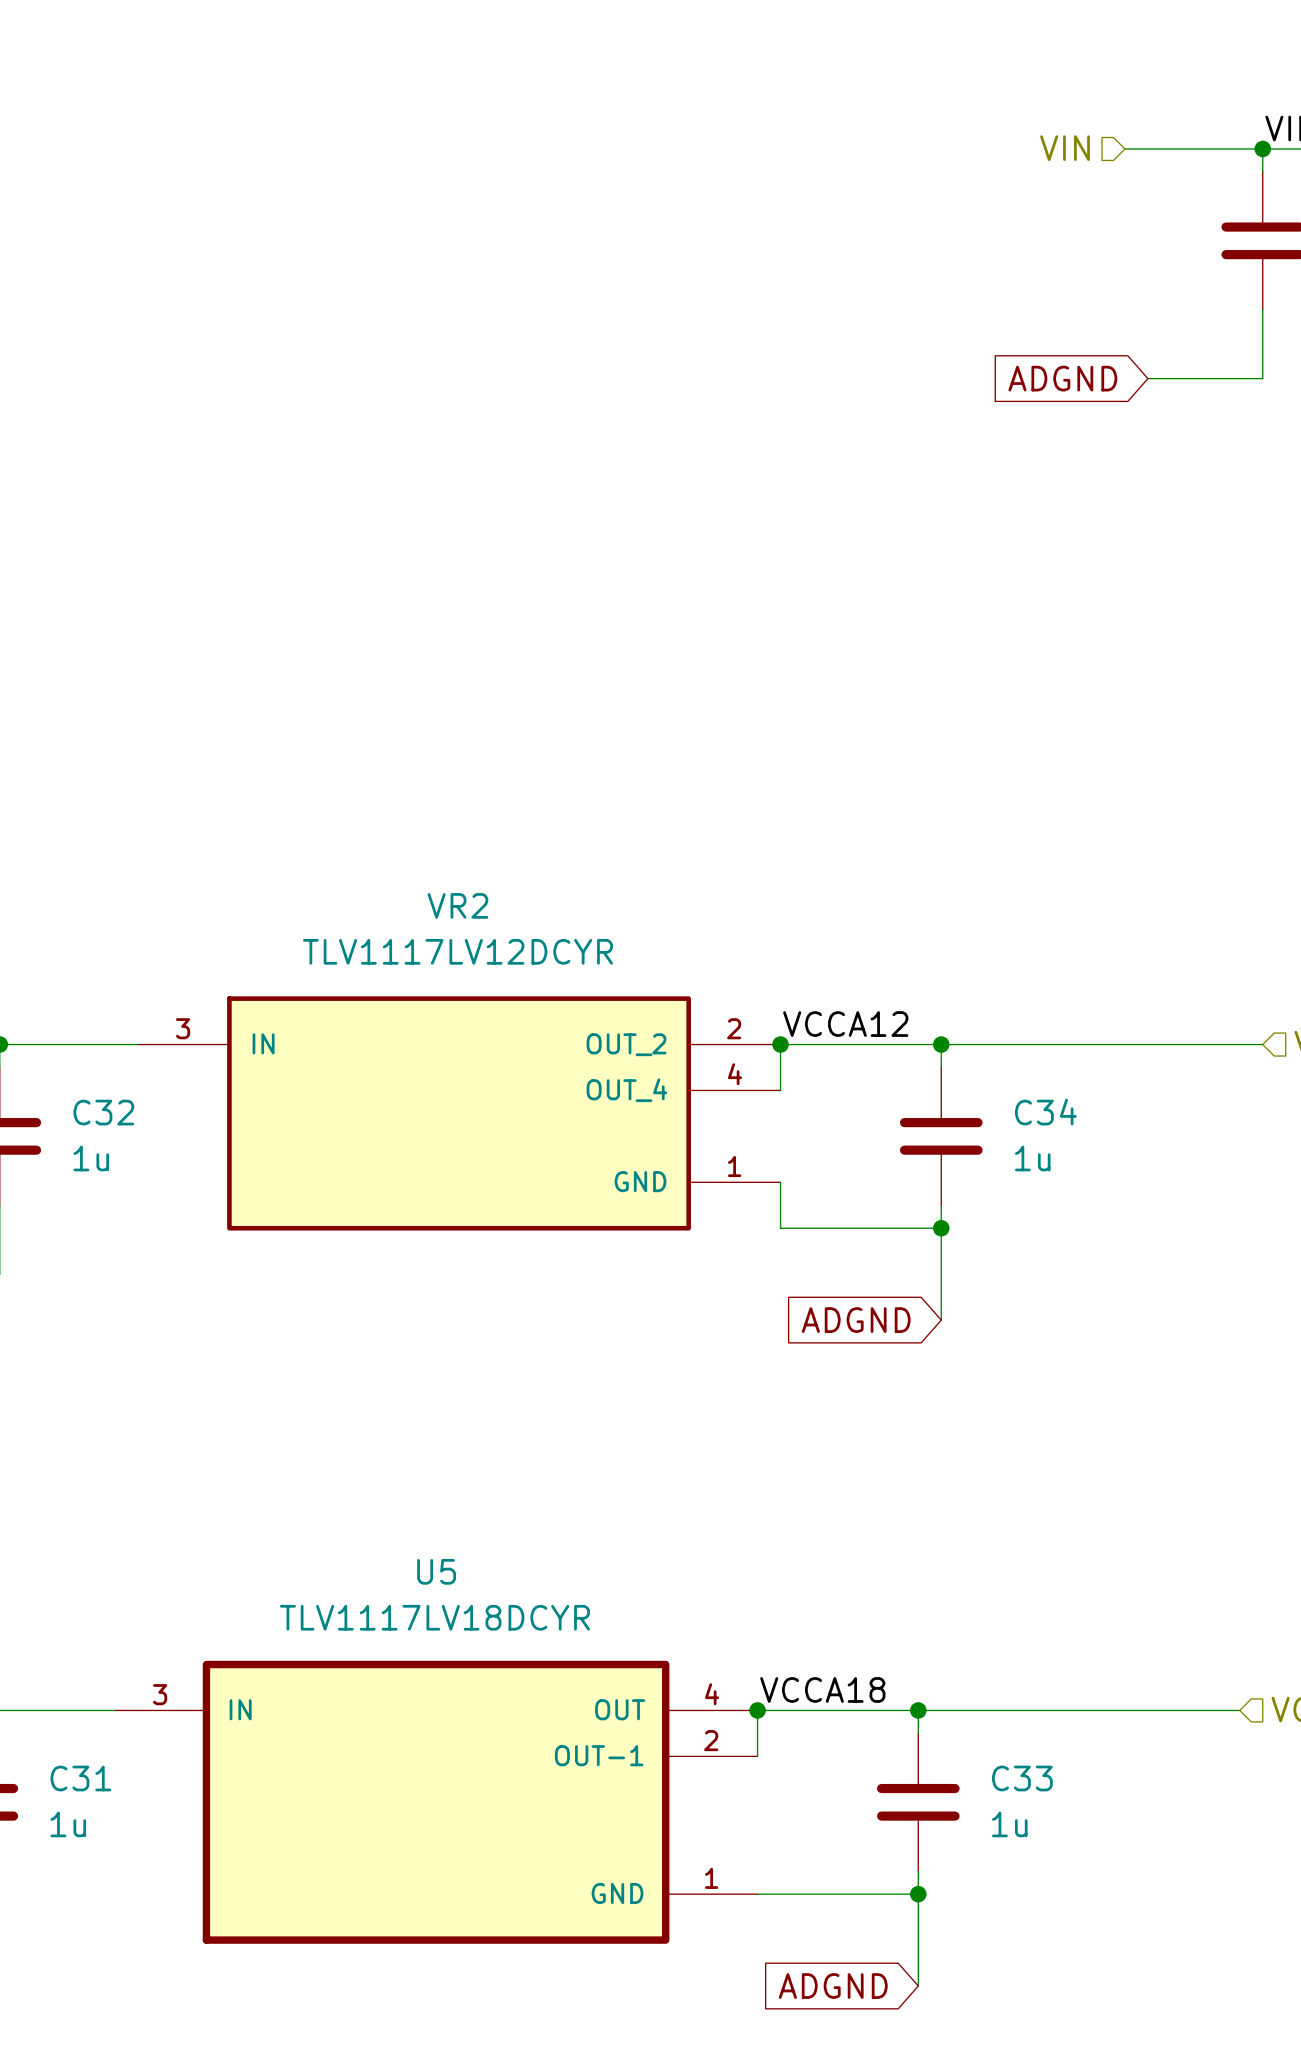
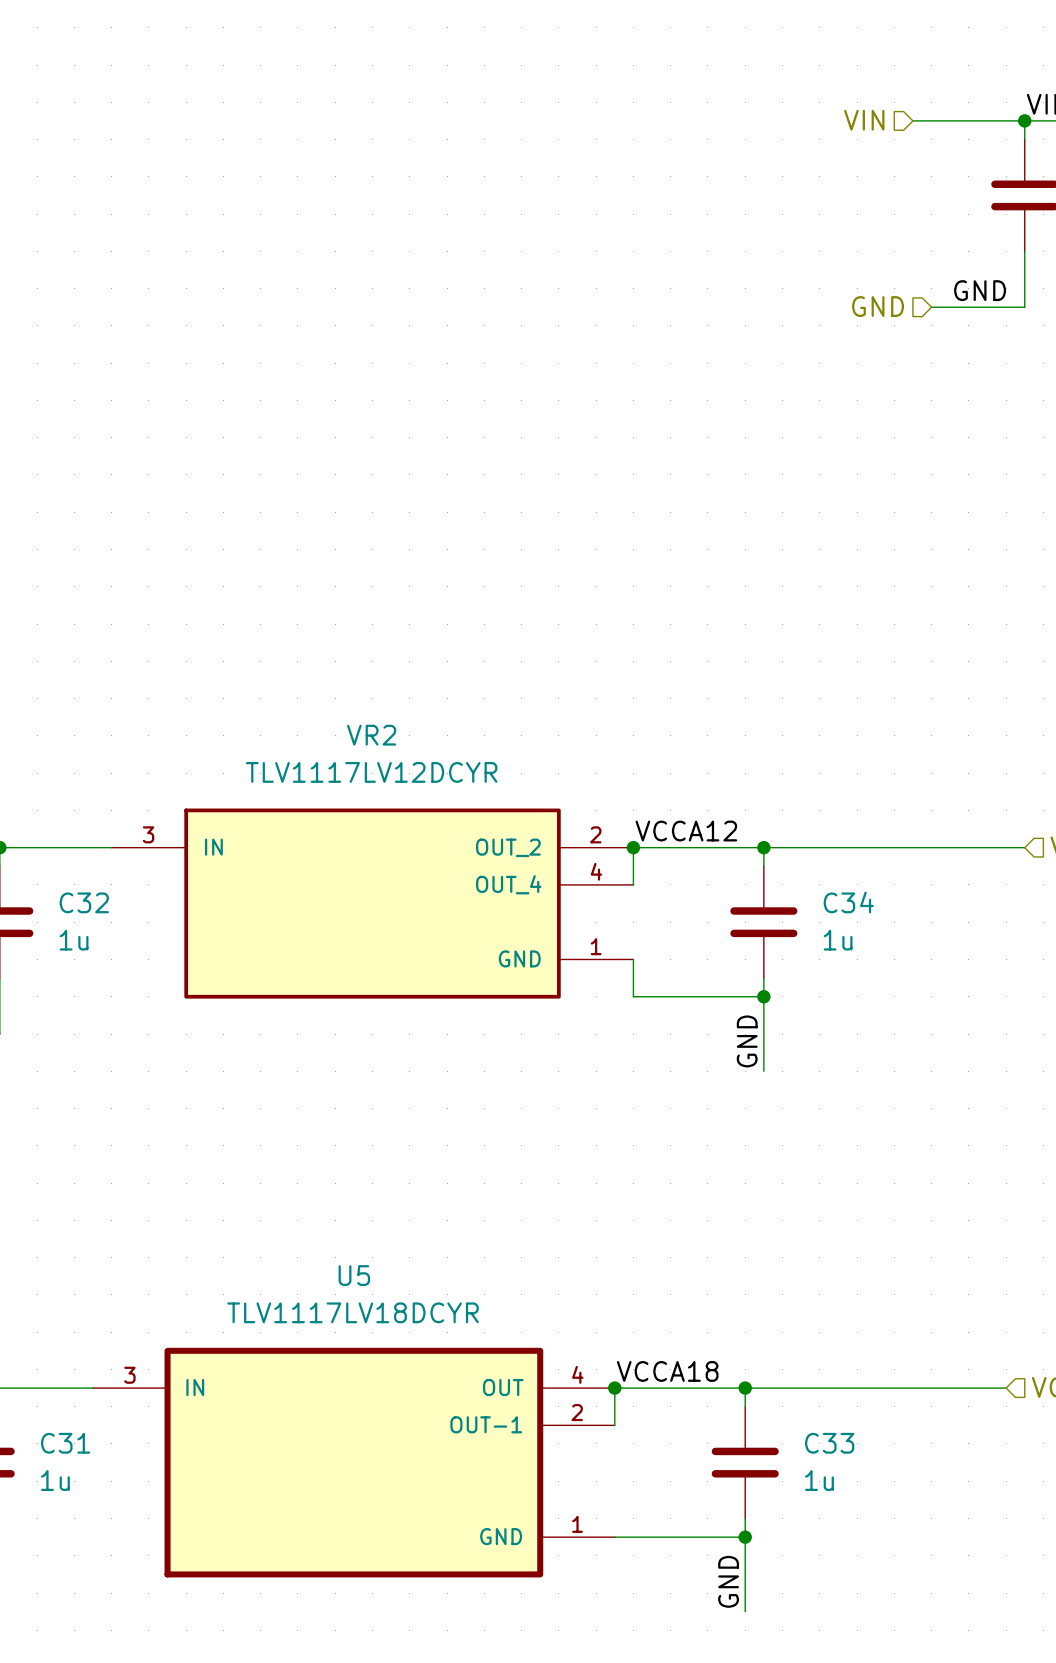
label: none -> GND (980, 290)
hierarchical label: none -> GND (878, 306)
global label: ADGND (1062, 378) -> none
label: none -> GND (747, 1041)
global label: ADGND (856, 1320) -> none
label: none -> GND (728, 1581)
global label: ADGND (833, 1986) -> none

